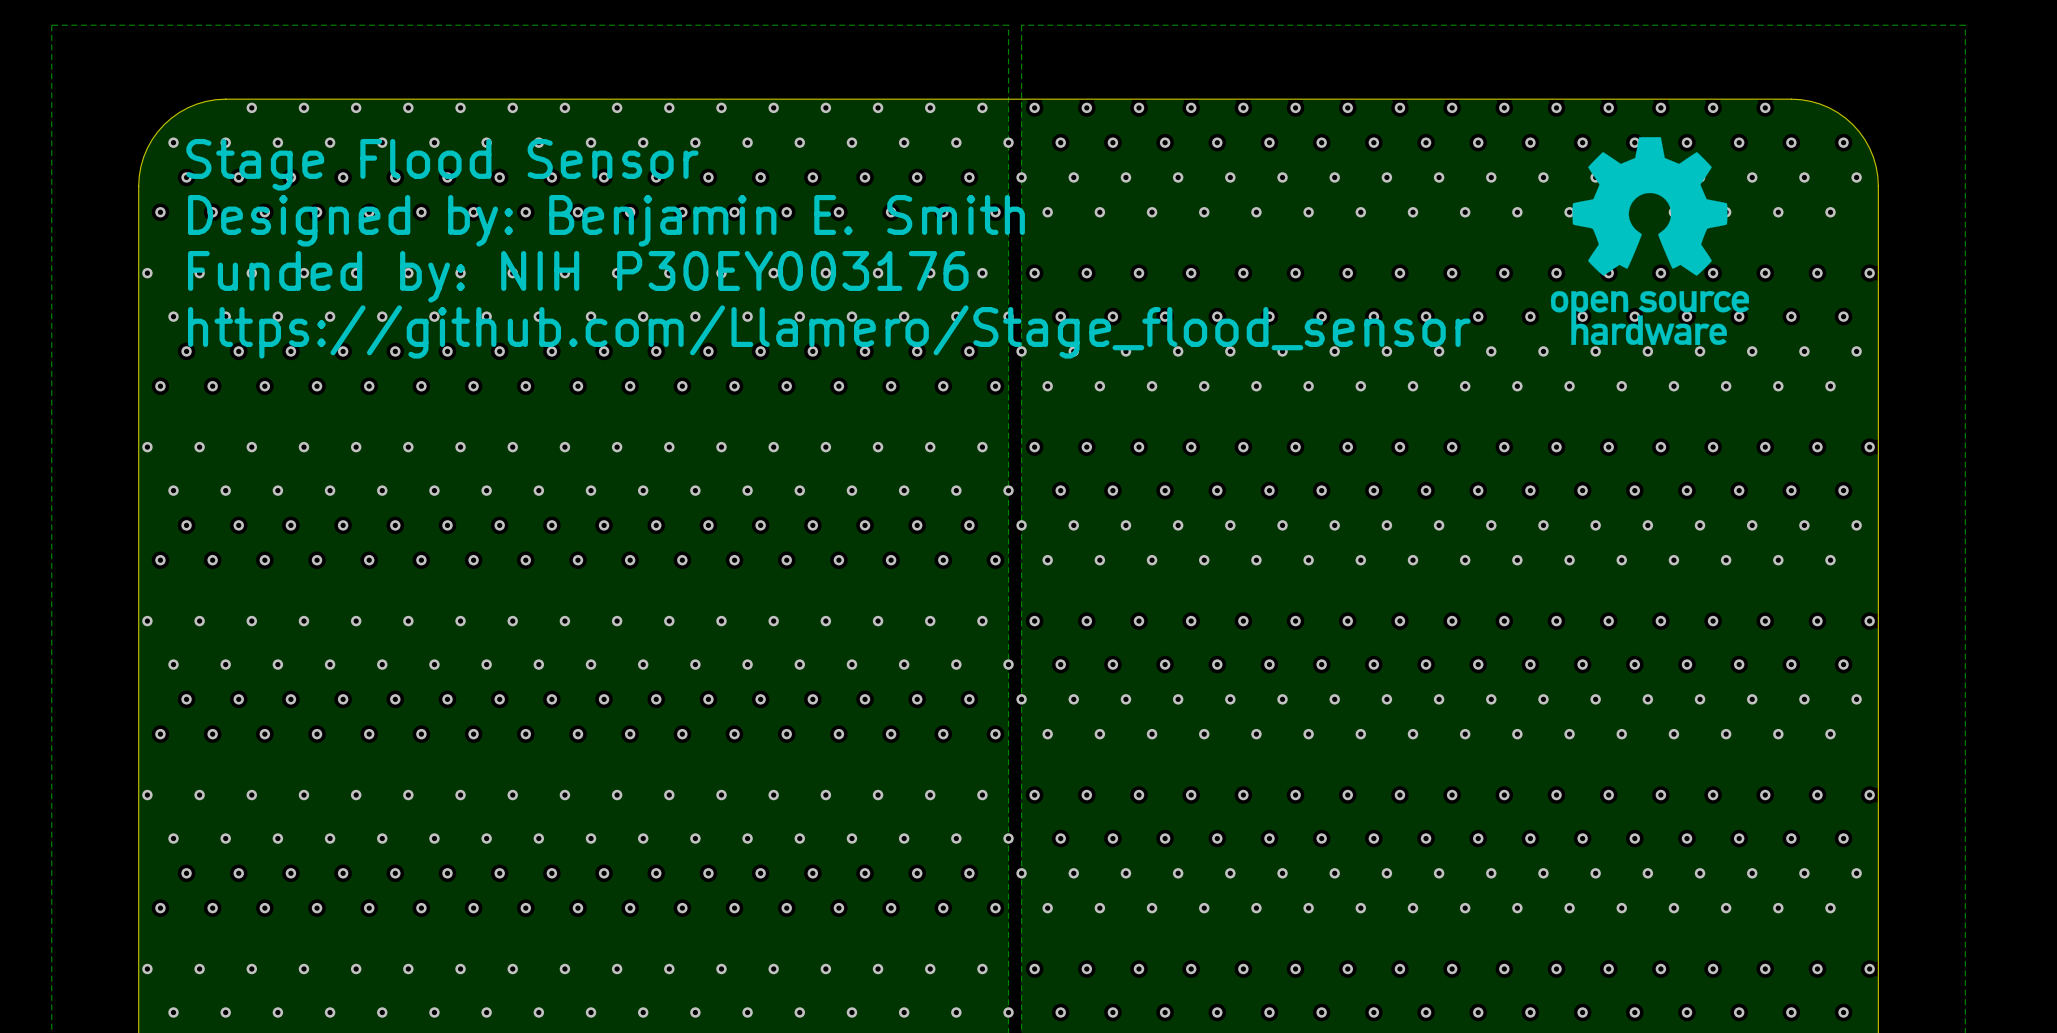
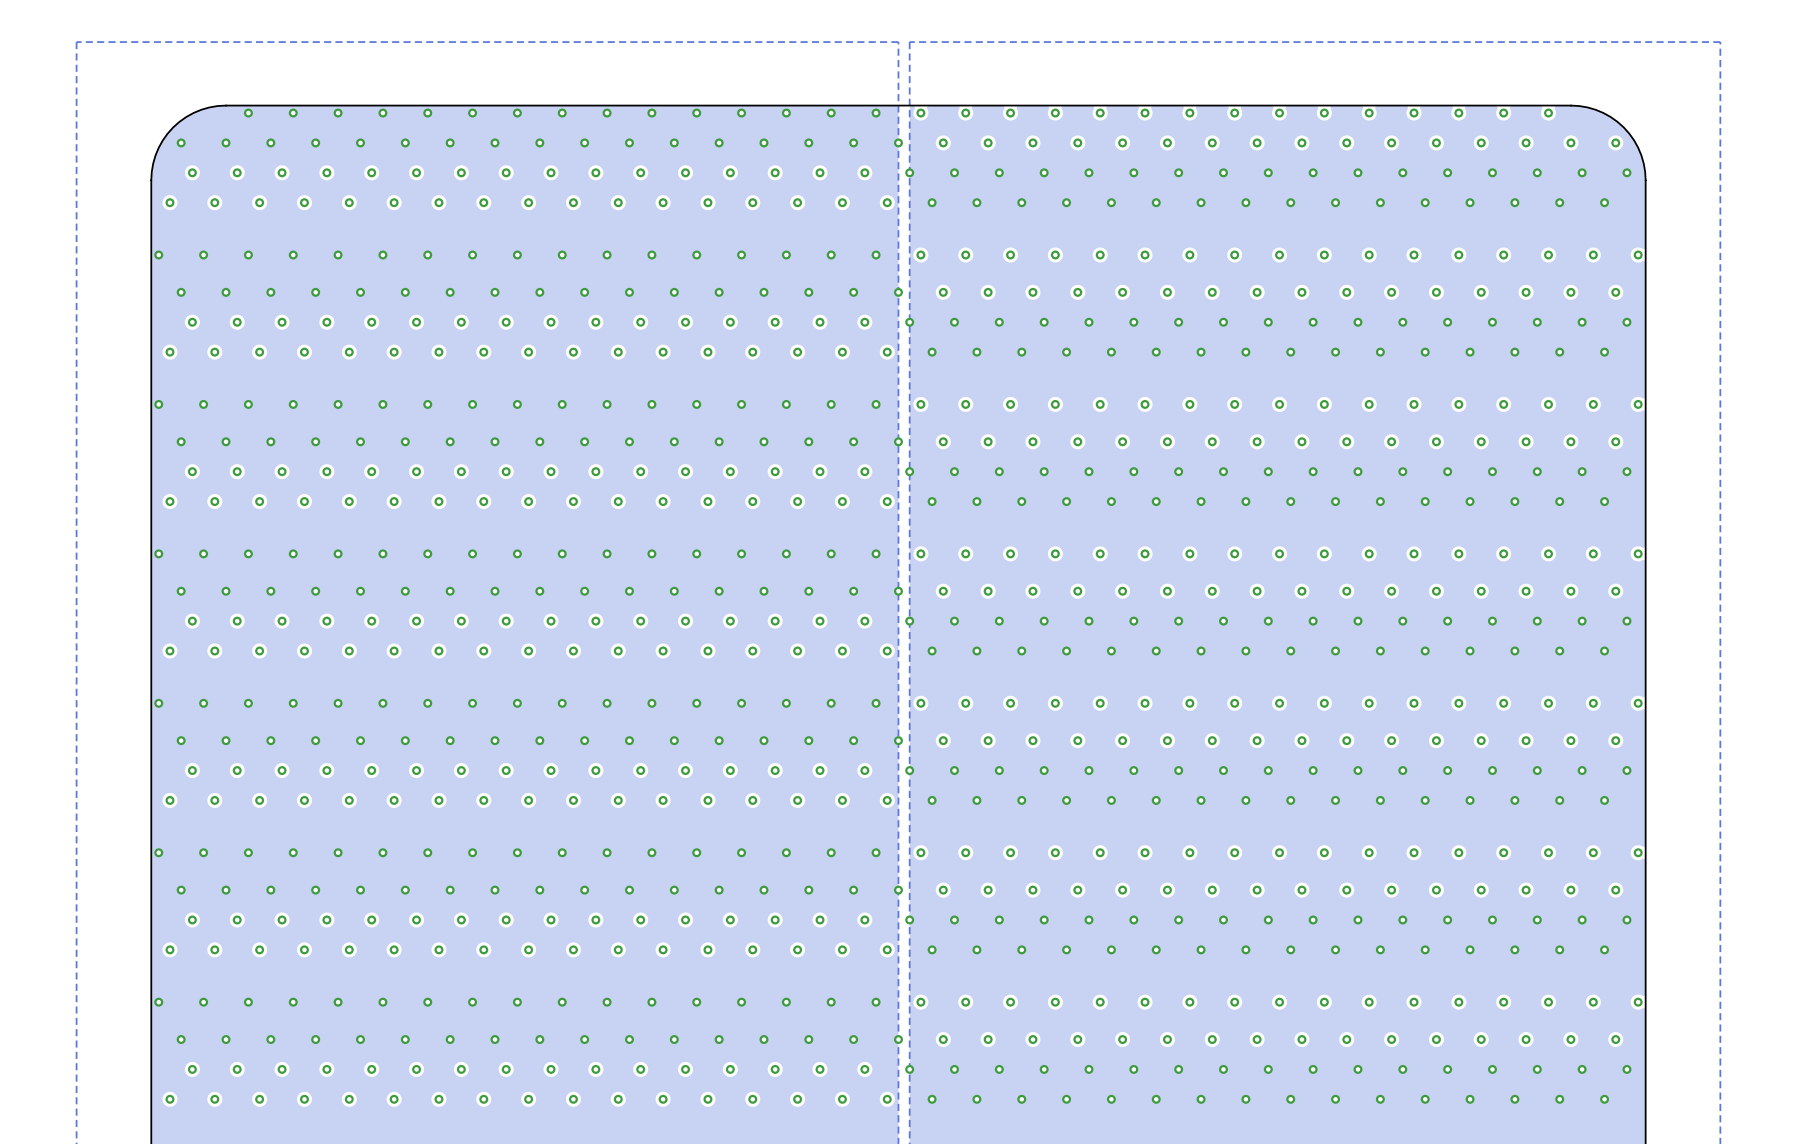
drawing: [1550, 137, 1750, 346] -> none
text: Stage Flood Sensor (442, 164) -> none
text: Designed by: Benjamin E. Smith (606, 220) -> none
text: Funded by: NIH P30EY003176 (578, 276) -> none
text: https://github.com/Llamero/Stage_flood_sensor (829, 331) -> none

